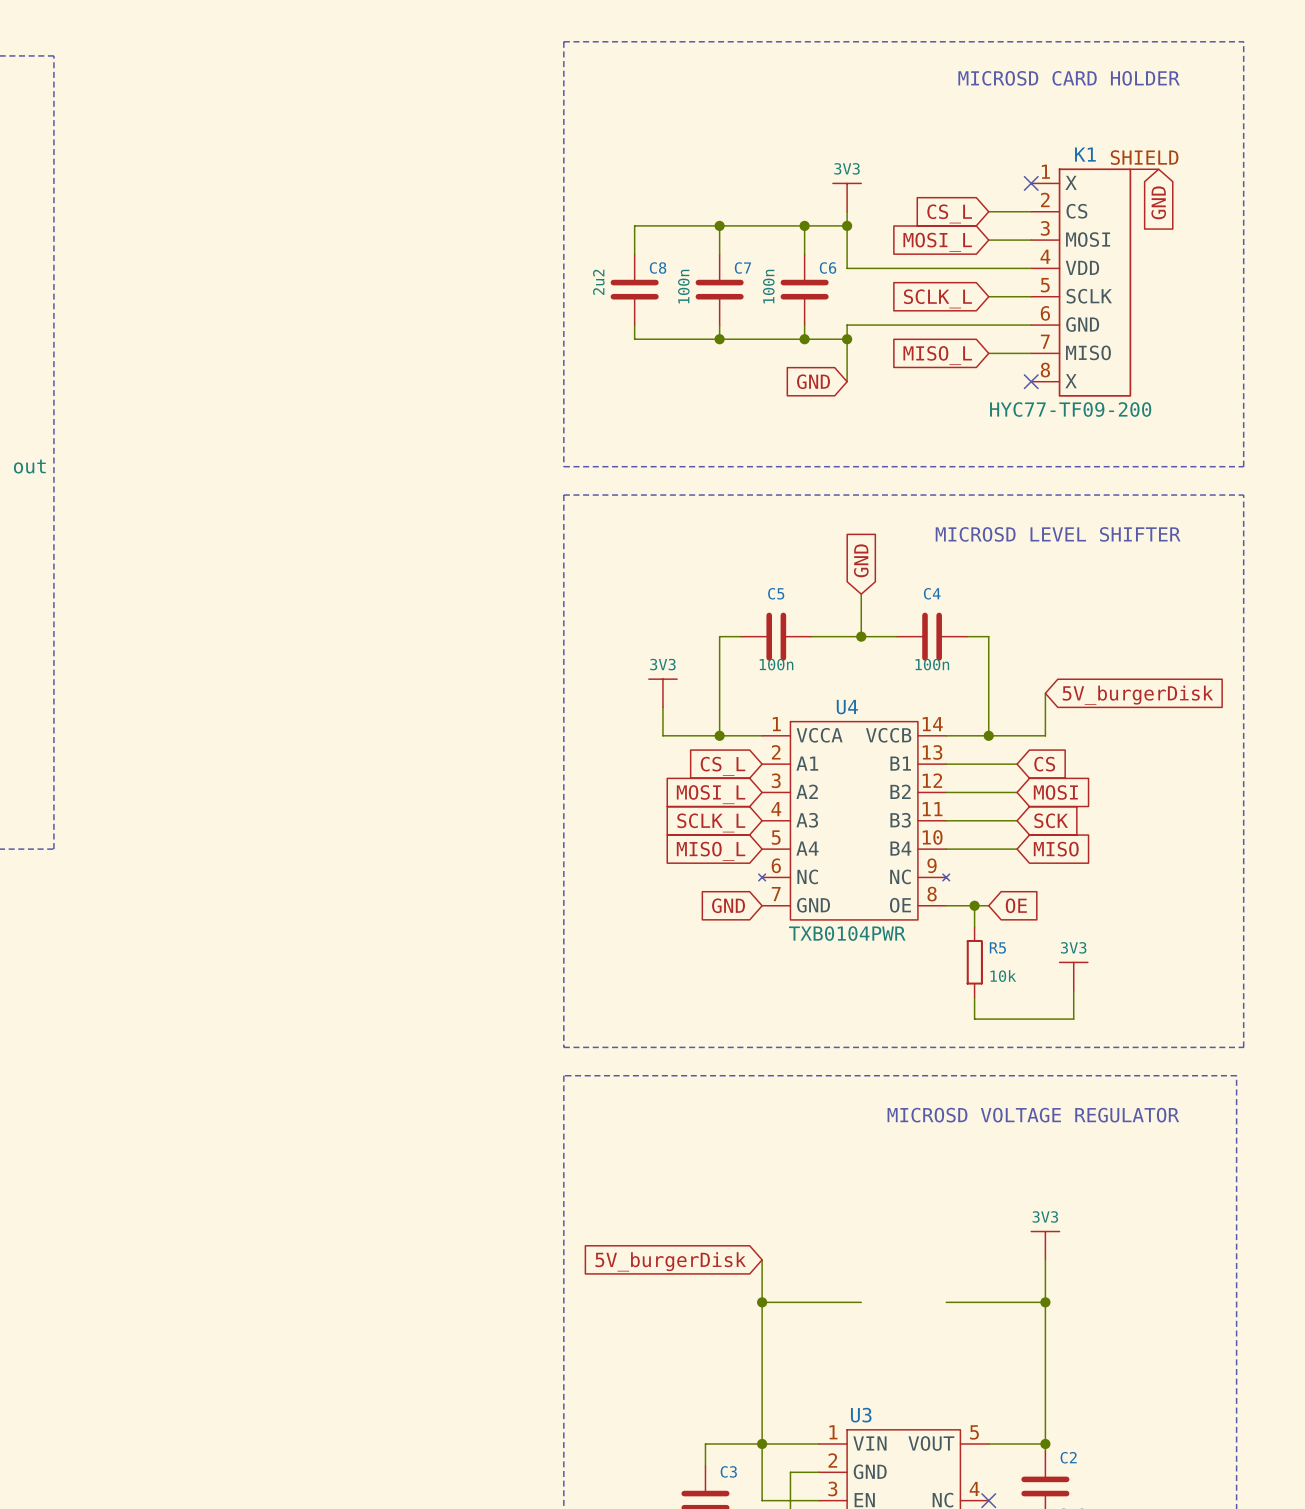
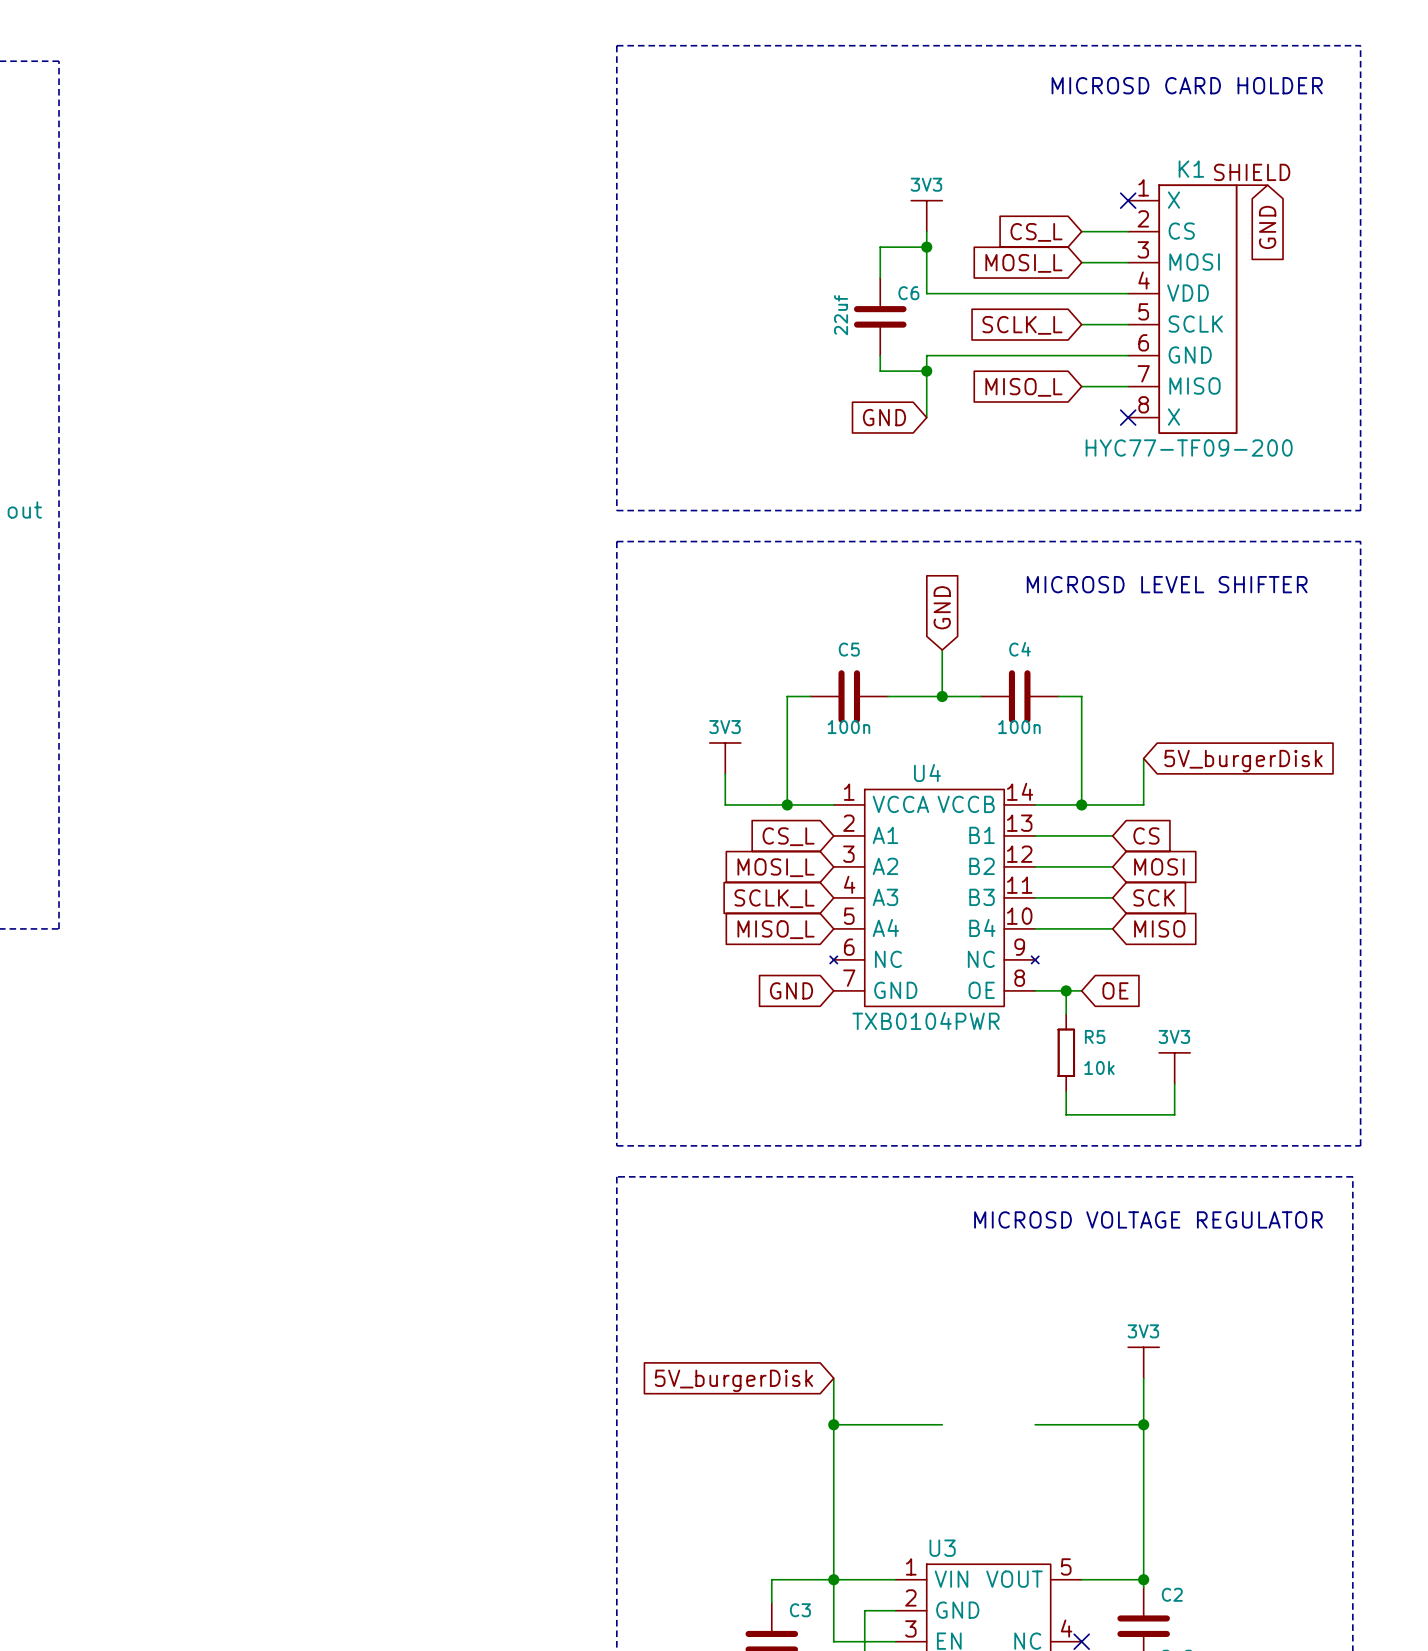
wire: (719, 225) (719, 254) -> none
junction: (719, 225) -> none
wire: (804, 225) (634, 225) (634, 254) -> none
junction: (804, 225) -> none
C6 value: 100n (768, 286) -> 22uf (841, 315)
C8: 2u2 (634, 289) -> none
C7: 100n (719, 289) -> none
wire: (634, 325) (634, 339) (804, 339) -> none
wire: (719, 325) (719, 339) -> none
junction: (719, 339) -> none
junction: (804, 339) -> none

